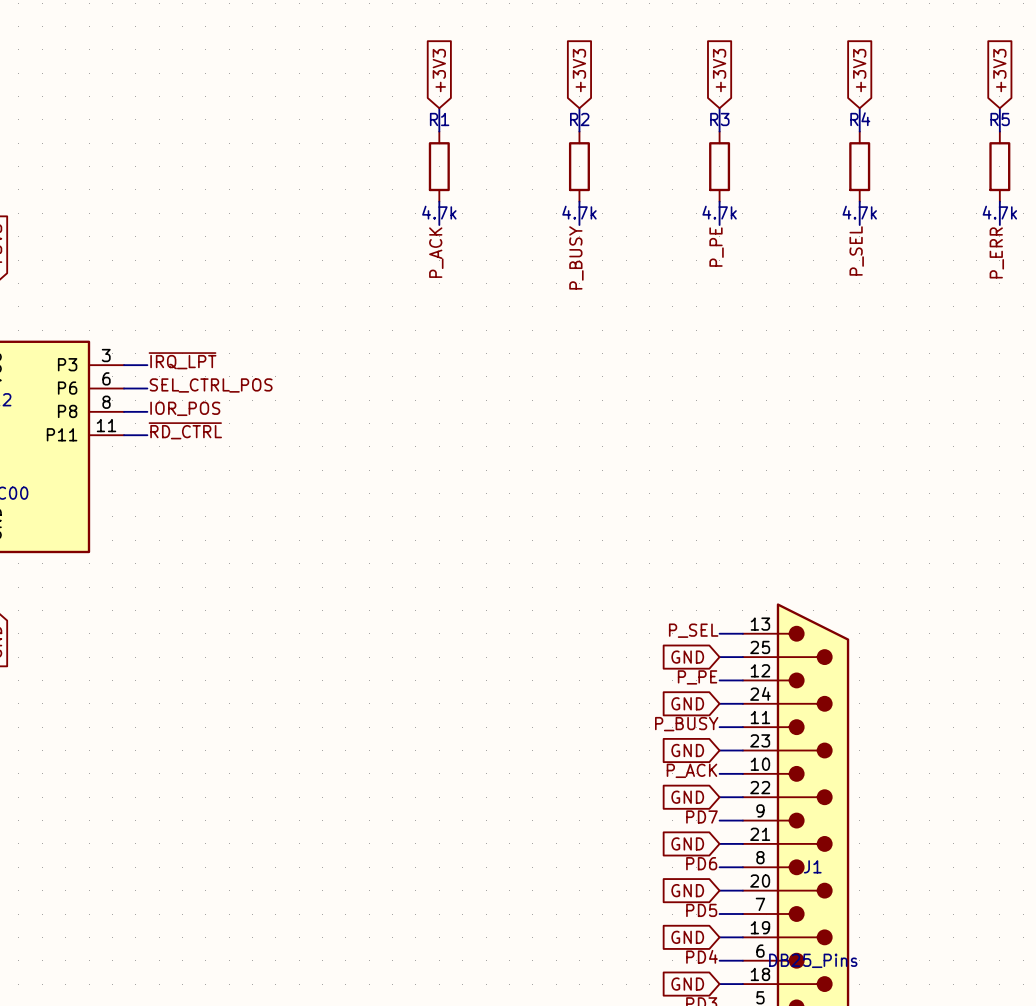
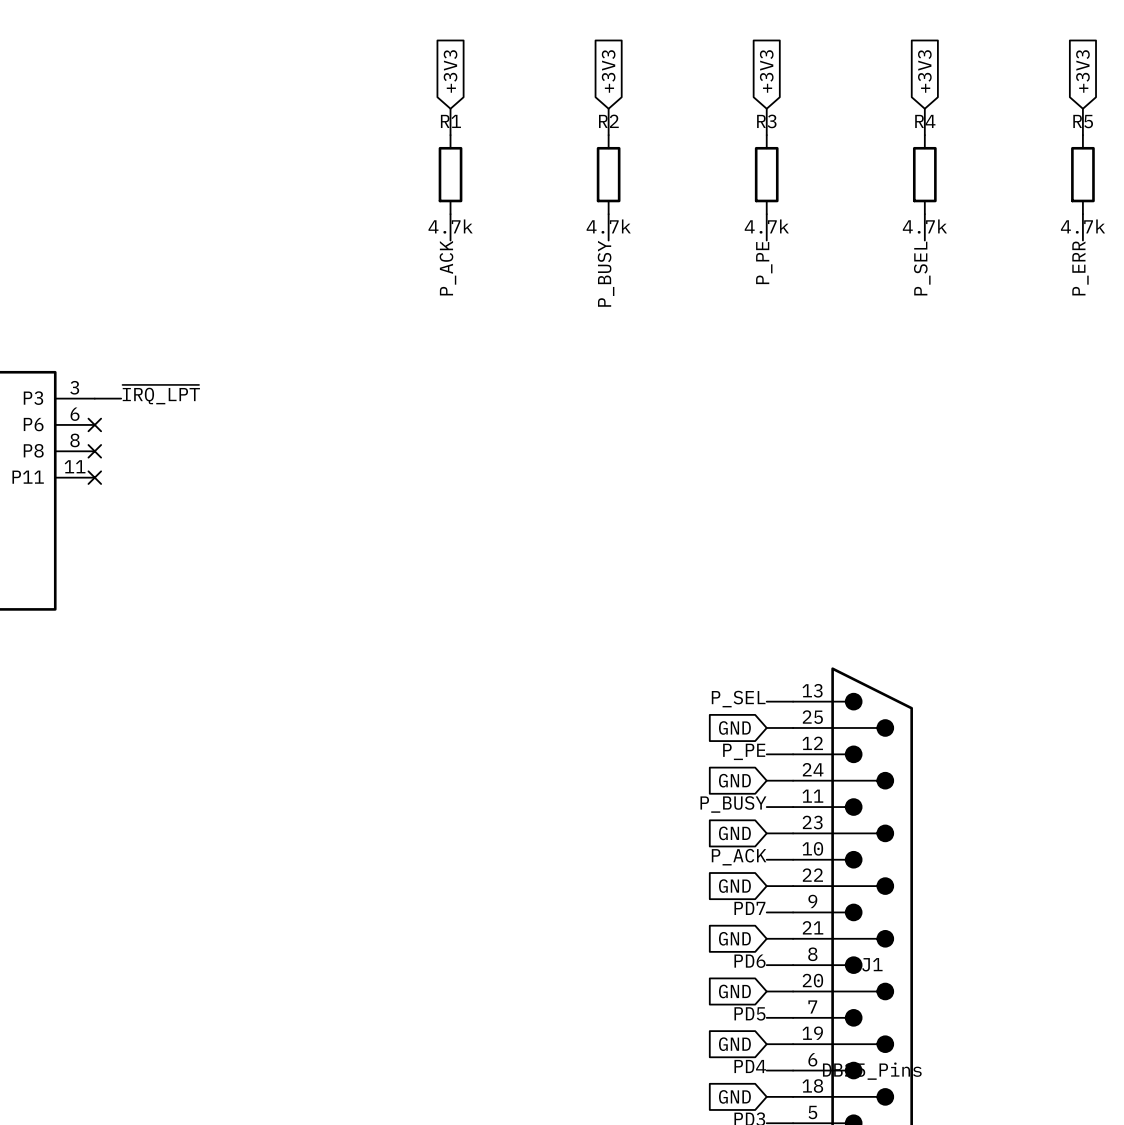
label: SEL_CTRL_POS (211, 385) -> none
wire: (124, 388) (147, 388) -> none
no-connect mark: none -> (94, 424)
label: IOR_POS (185, 408) -> none
wire: (124, 411) (147, 411) -> none
no-connect mark: none -> (94, 451)
label: ~{RD_CTRL} (185, 430) -> none
wire: (124, 435) (147, 435) -> none
no-connect mark: none -> (94, 477)

